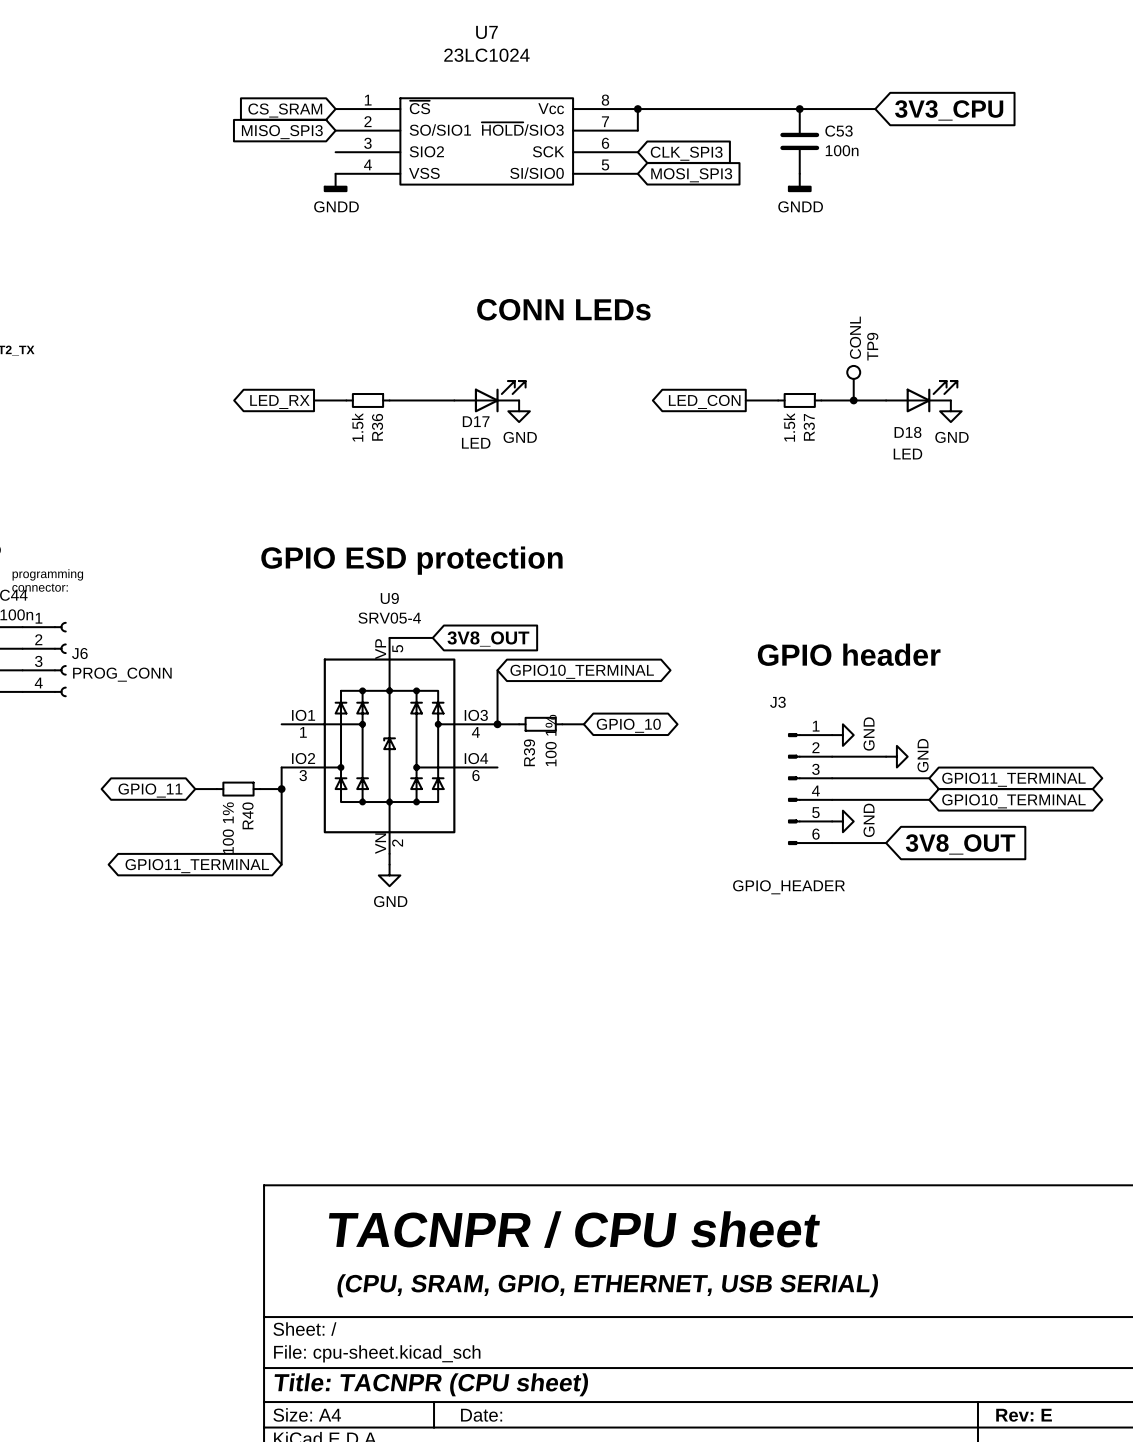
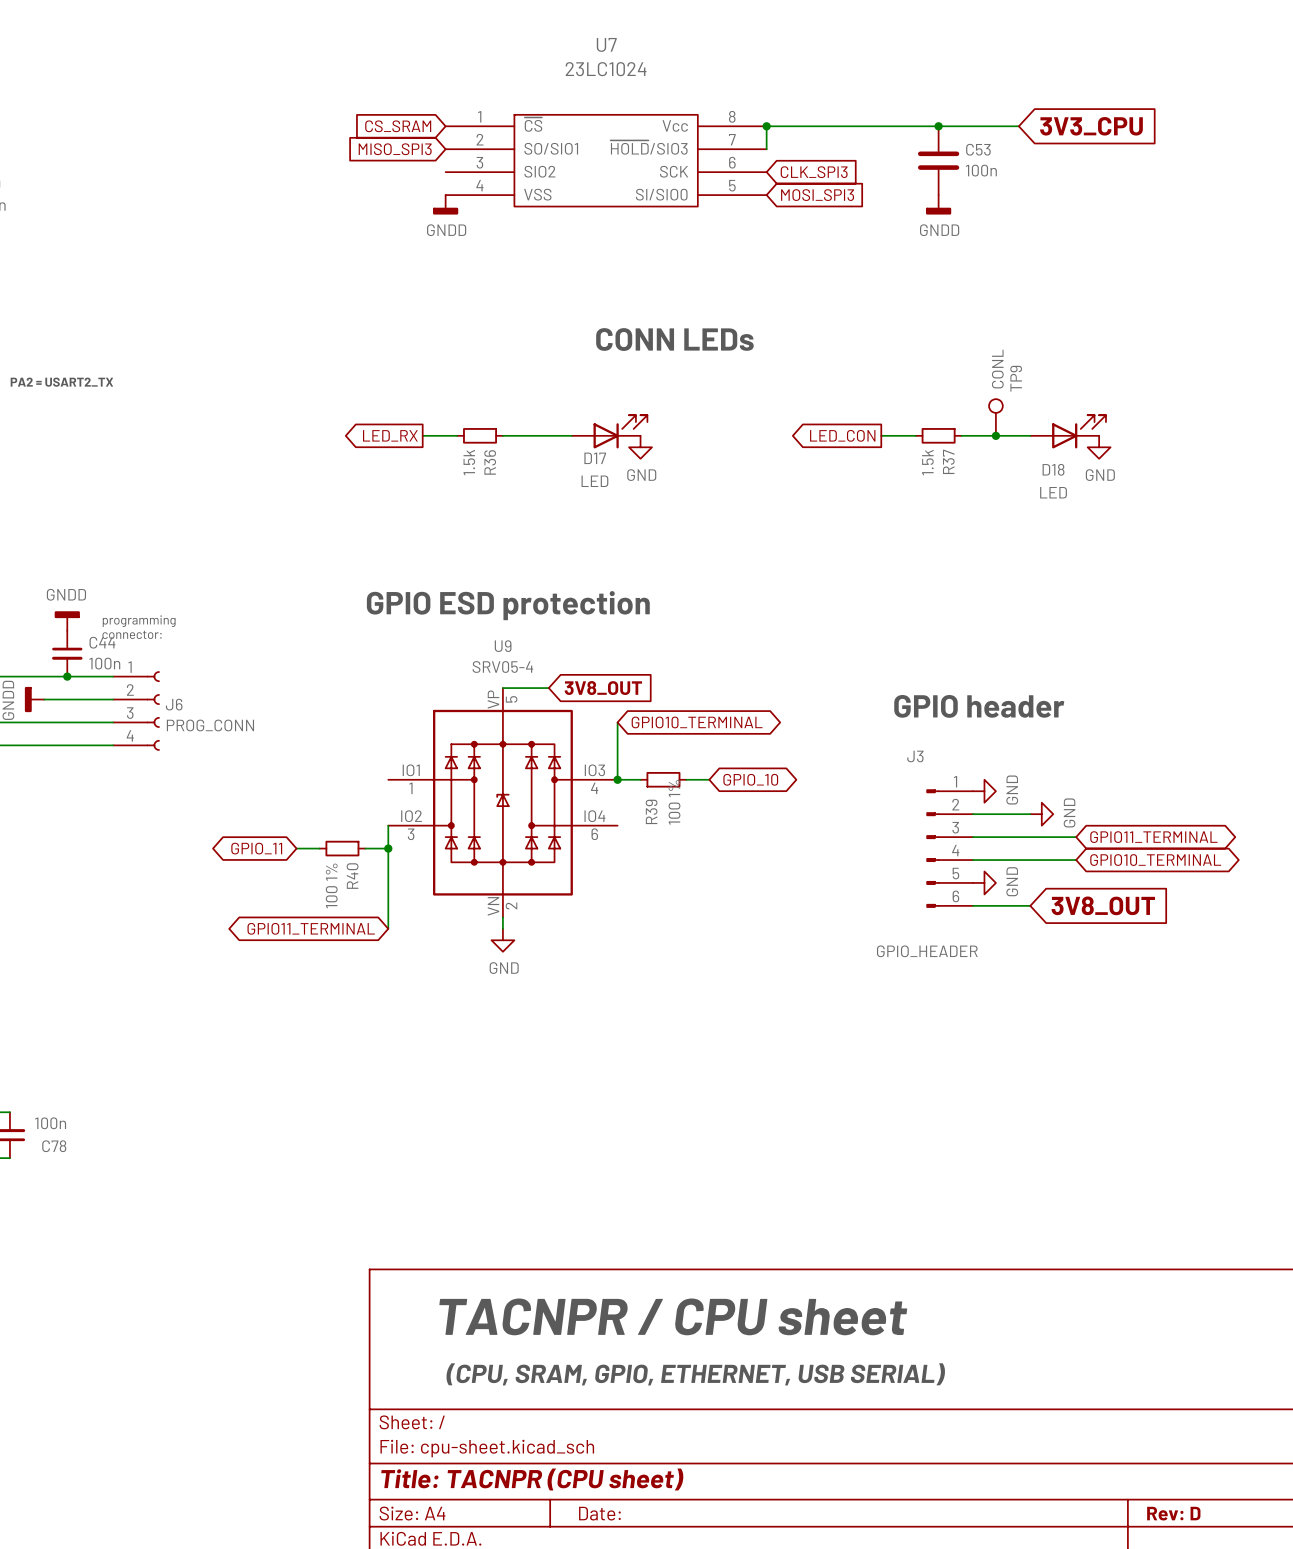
title block: Rev: E (1024, 1415) -> Rev: D (1173, 1513)

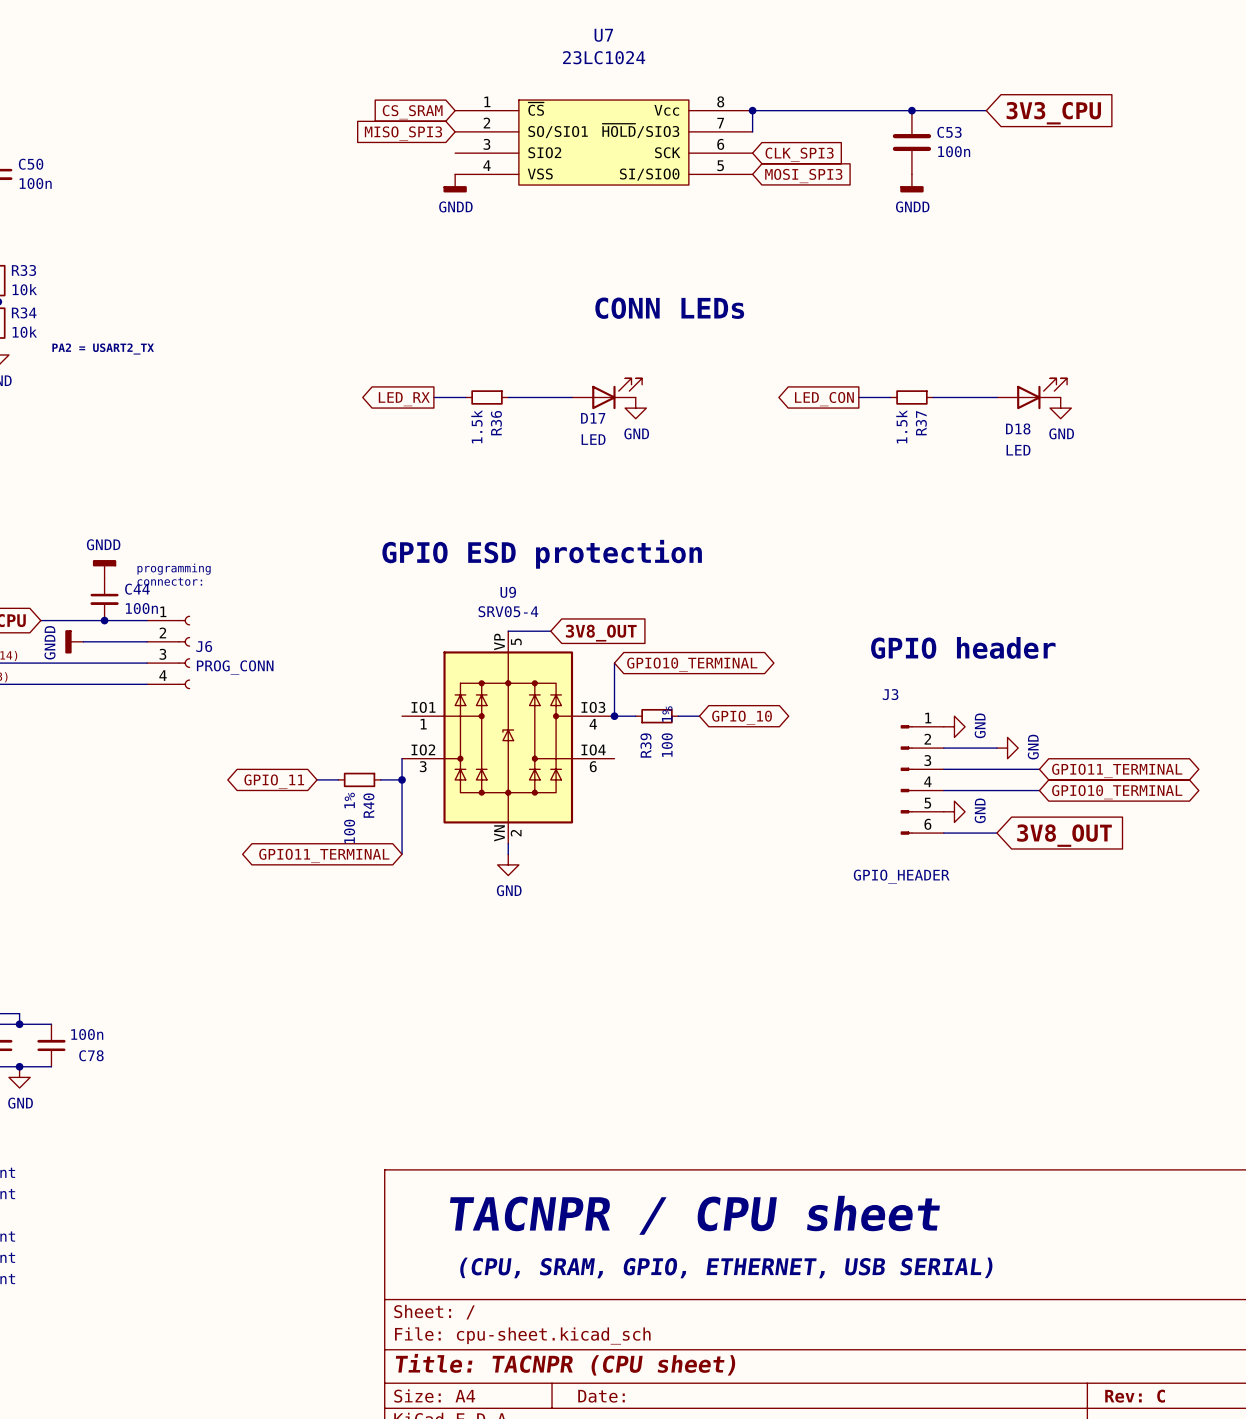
TP9: CONL (995, 417) -> none
junction: (995, 435) -> none
title block: Rev: D (1173, 1513) -> Rev: C (1135, 1396)

